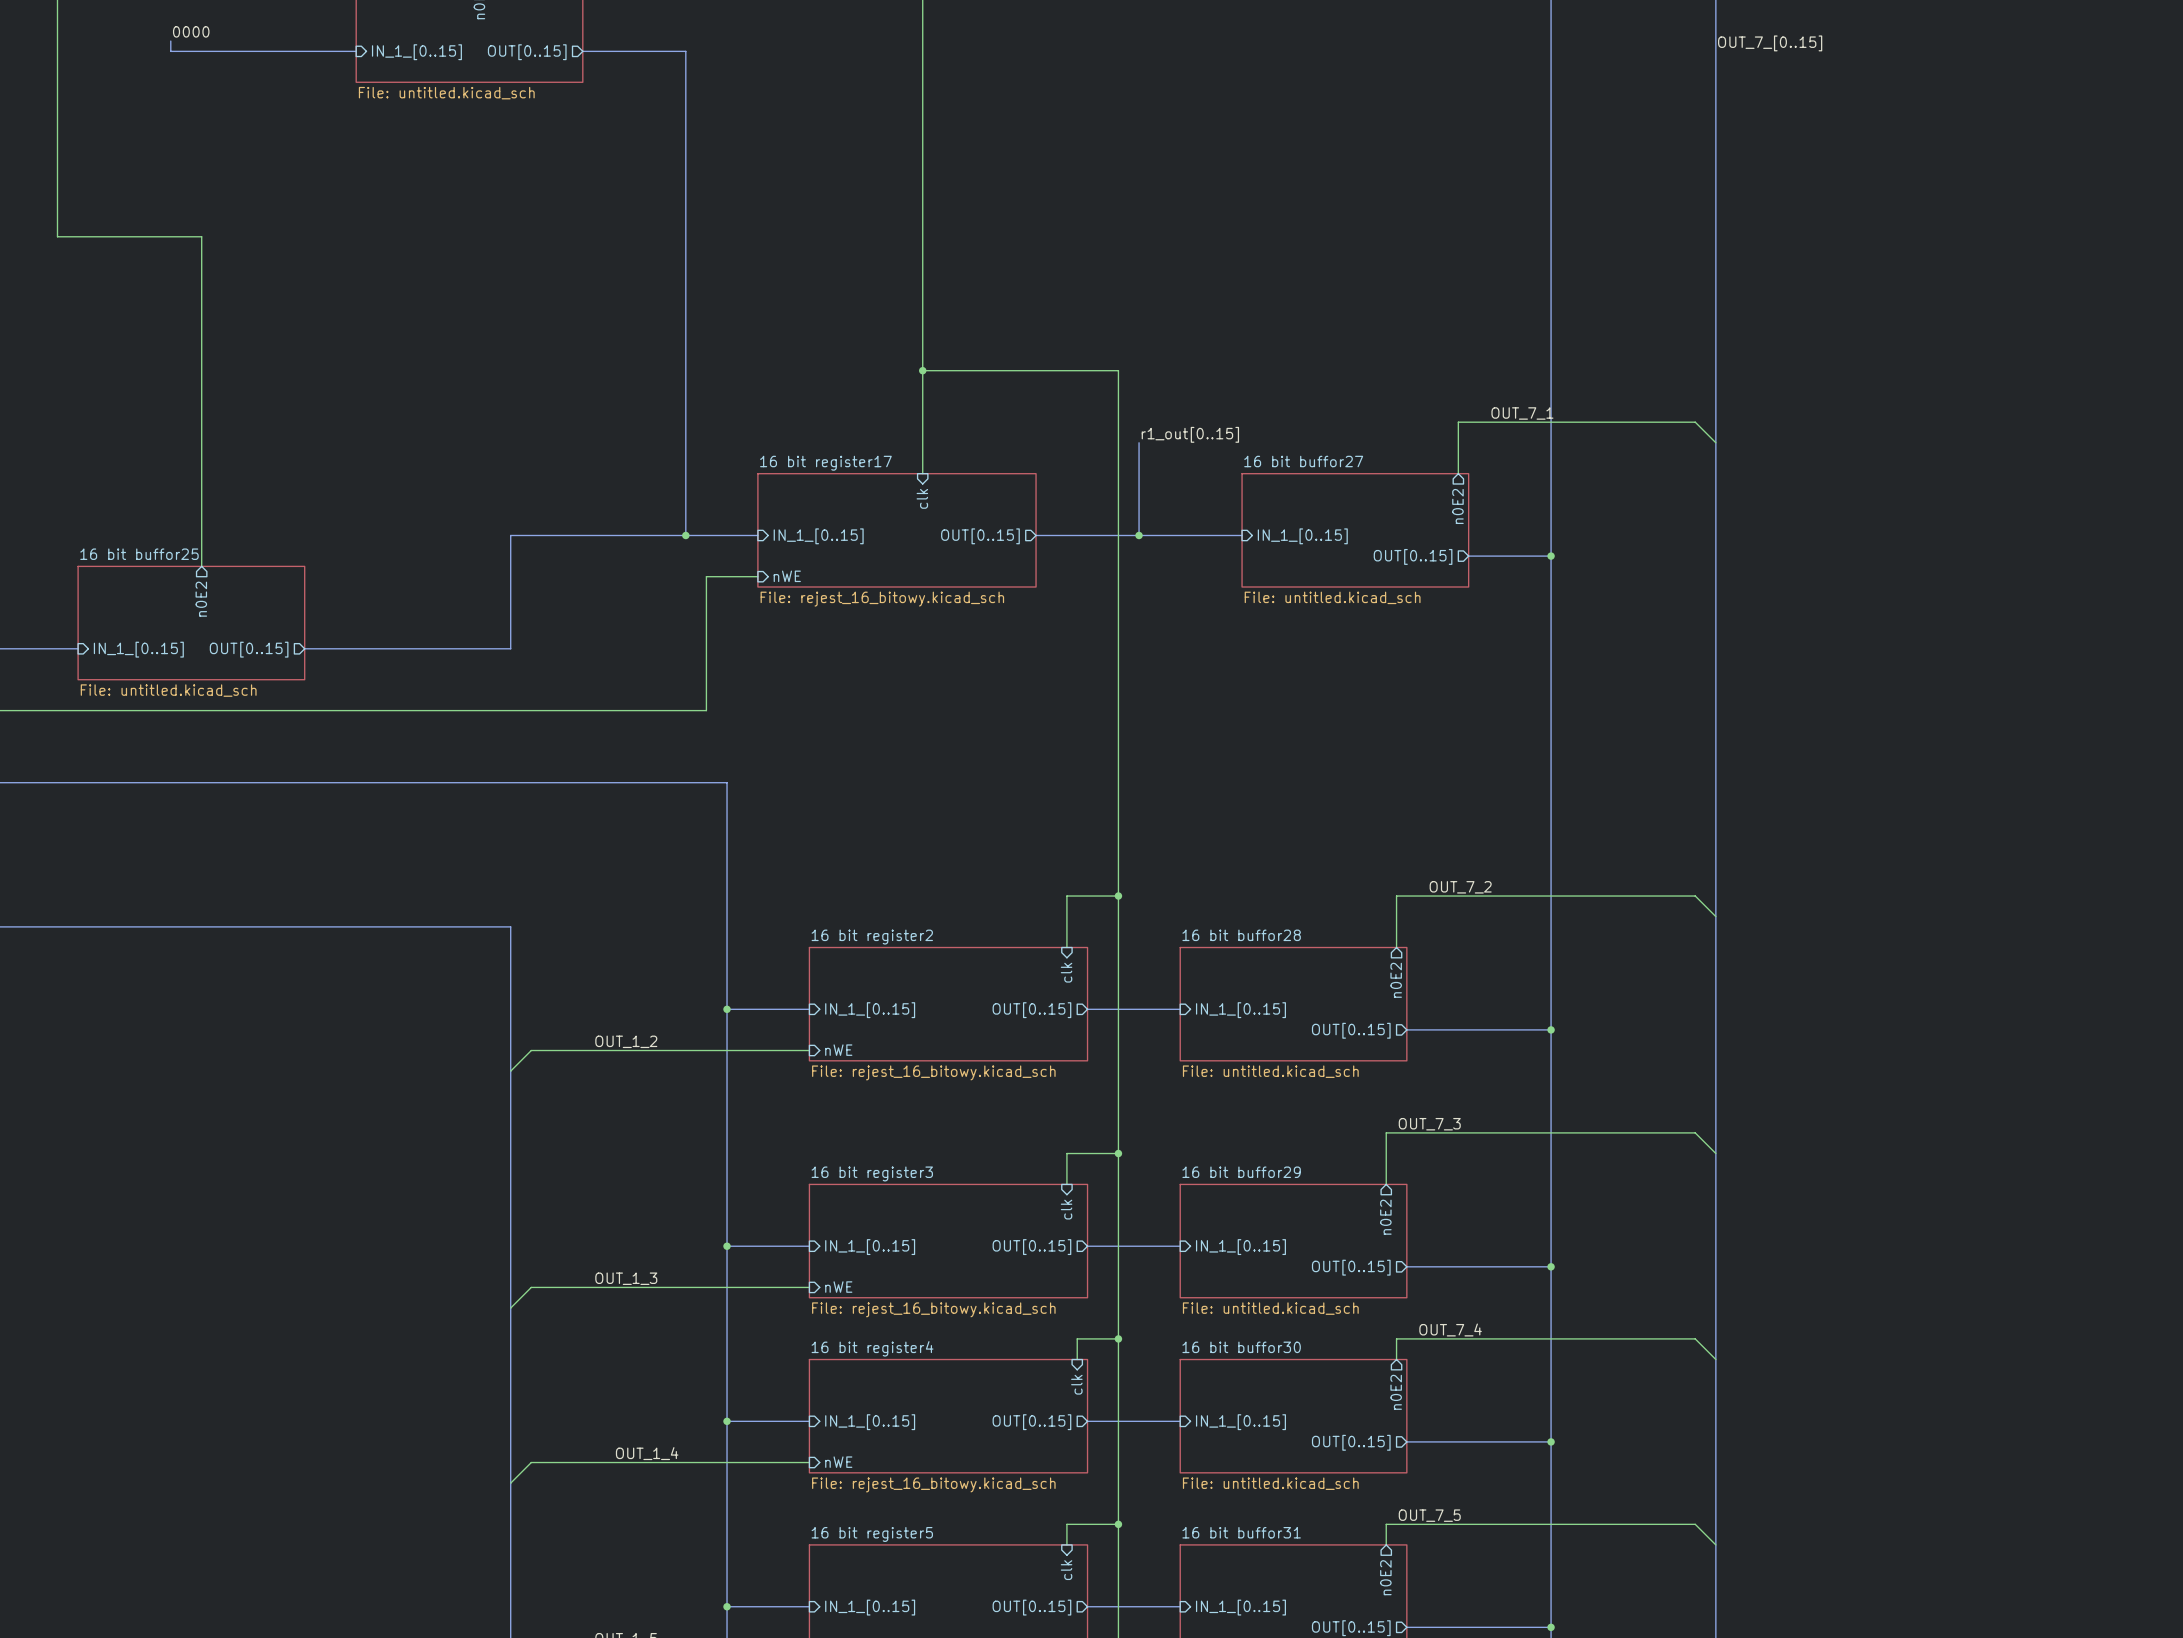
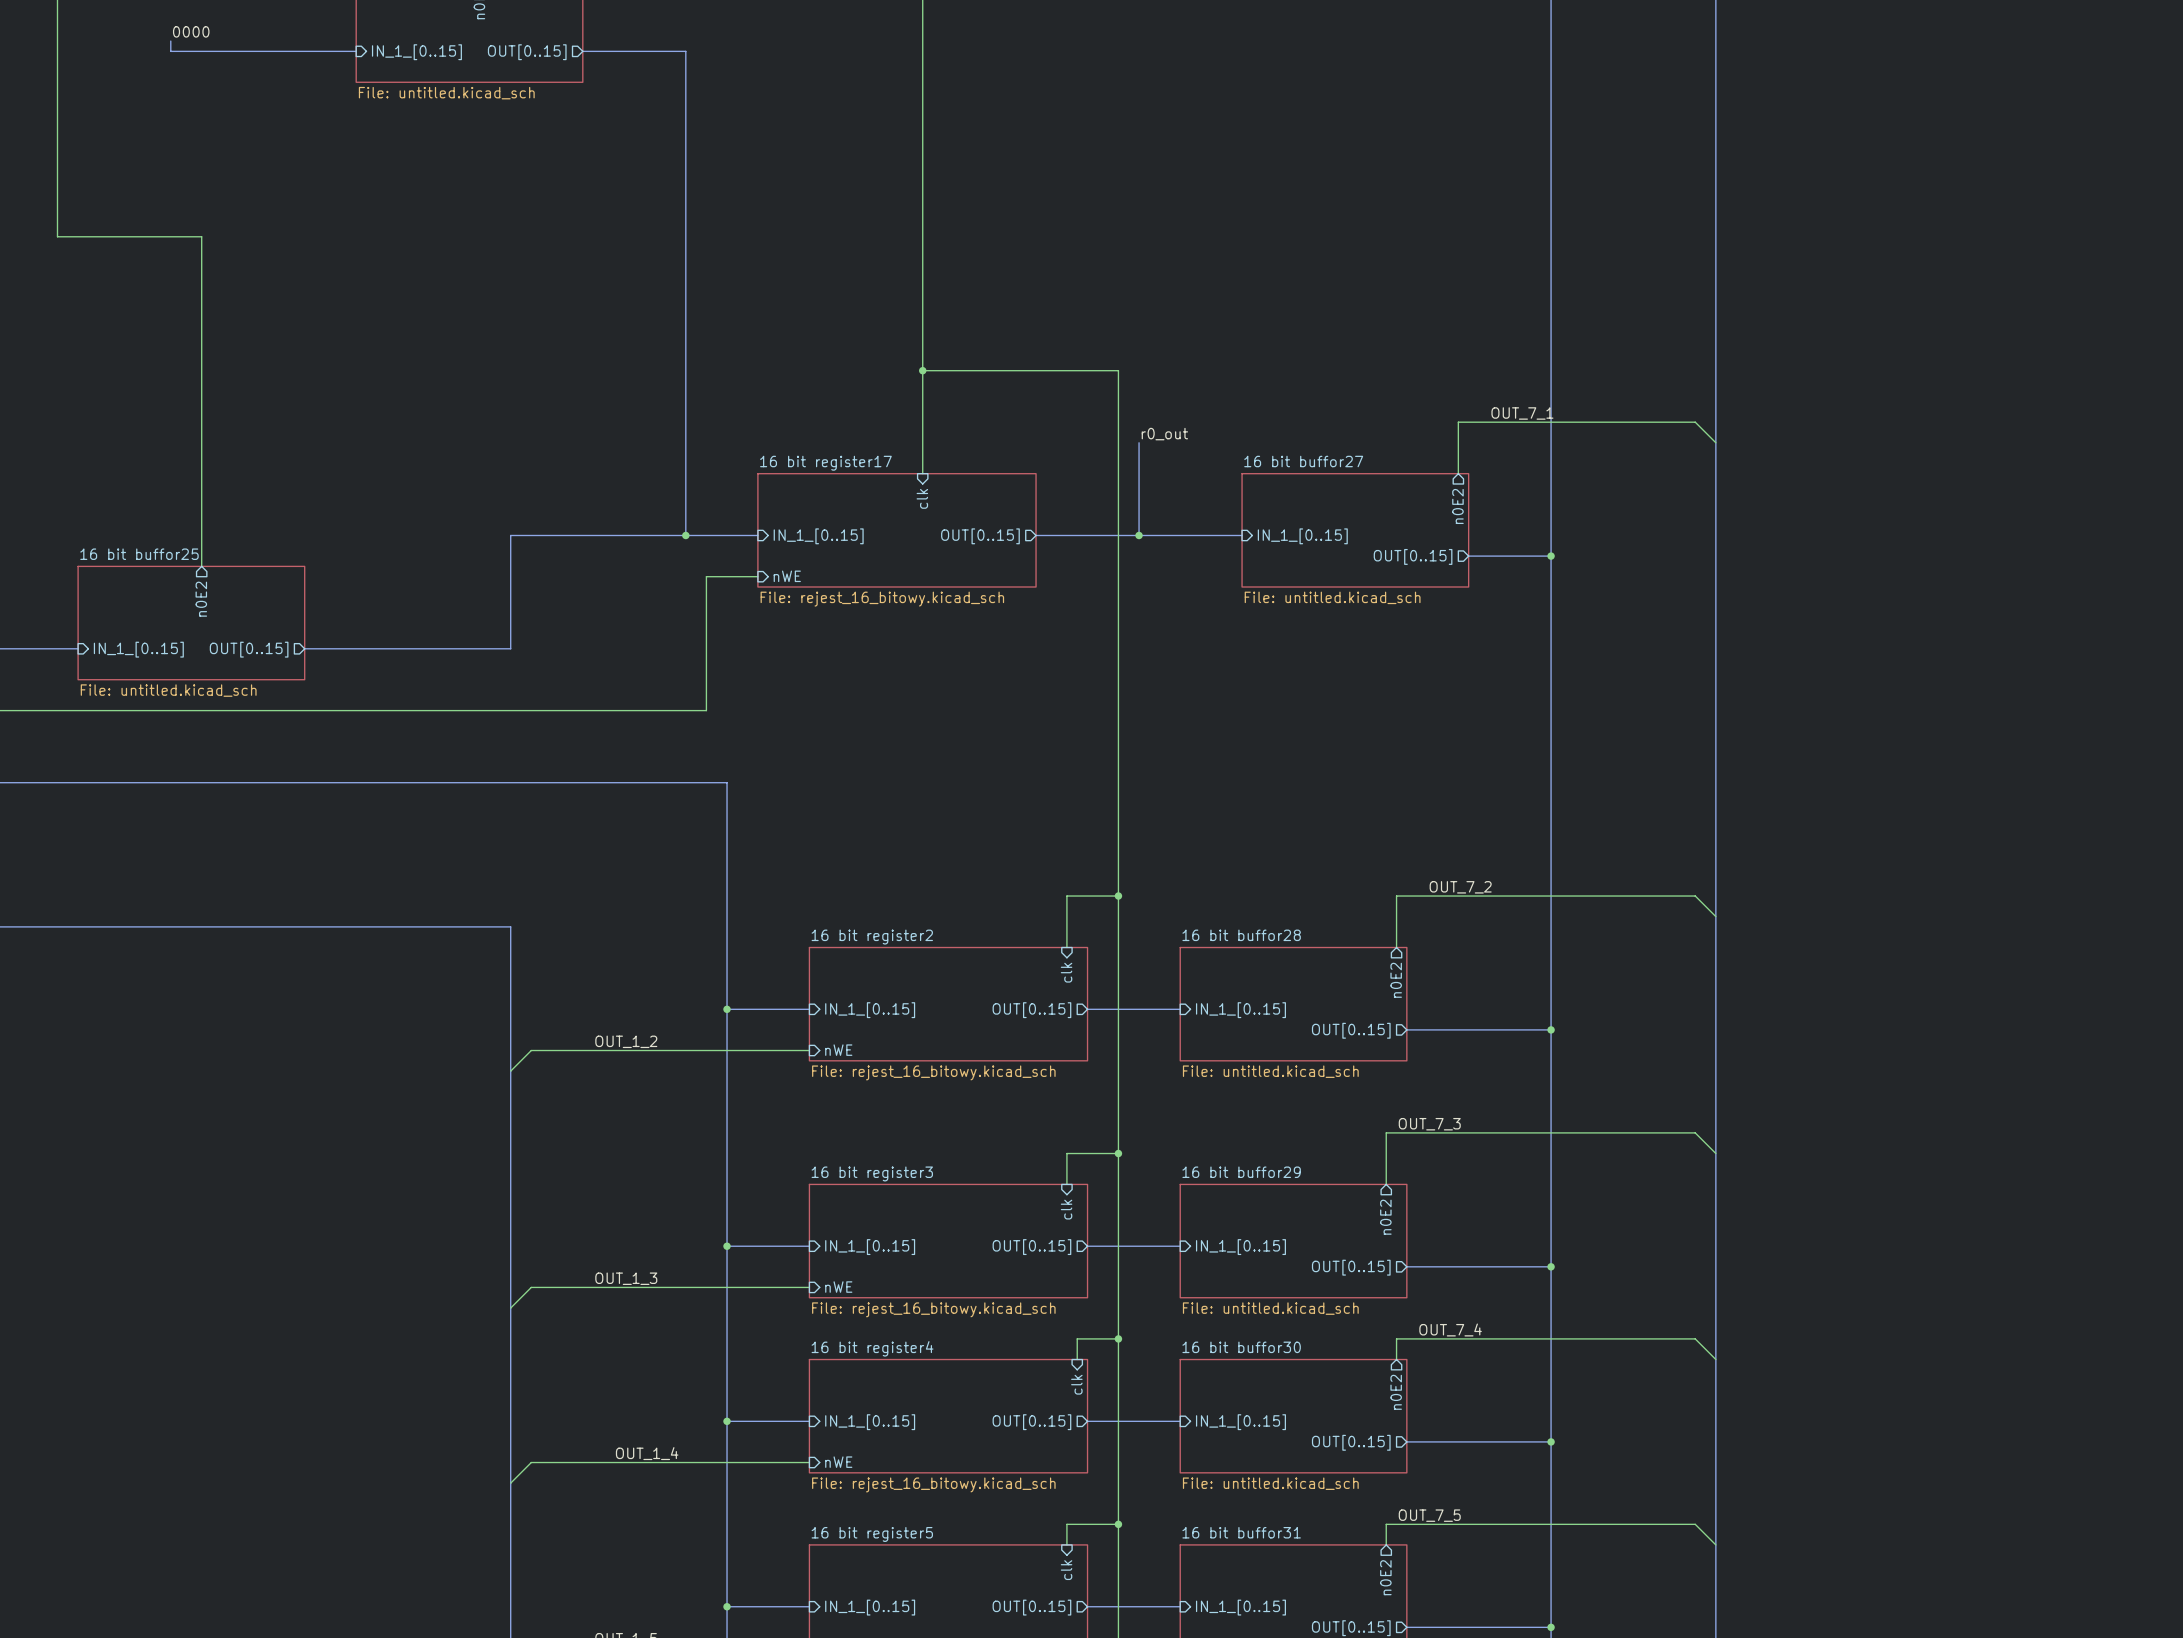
label: OUT_7_[0..15] (1770, 43) -> none
label: r1_out[0..15] (1190, 434) -> r0_out (1164, 434)

